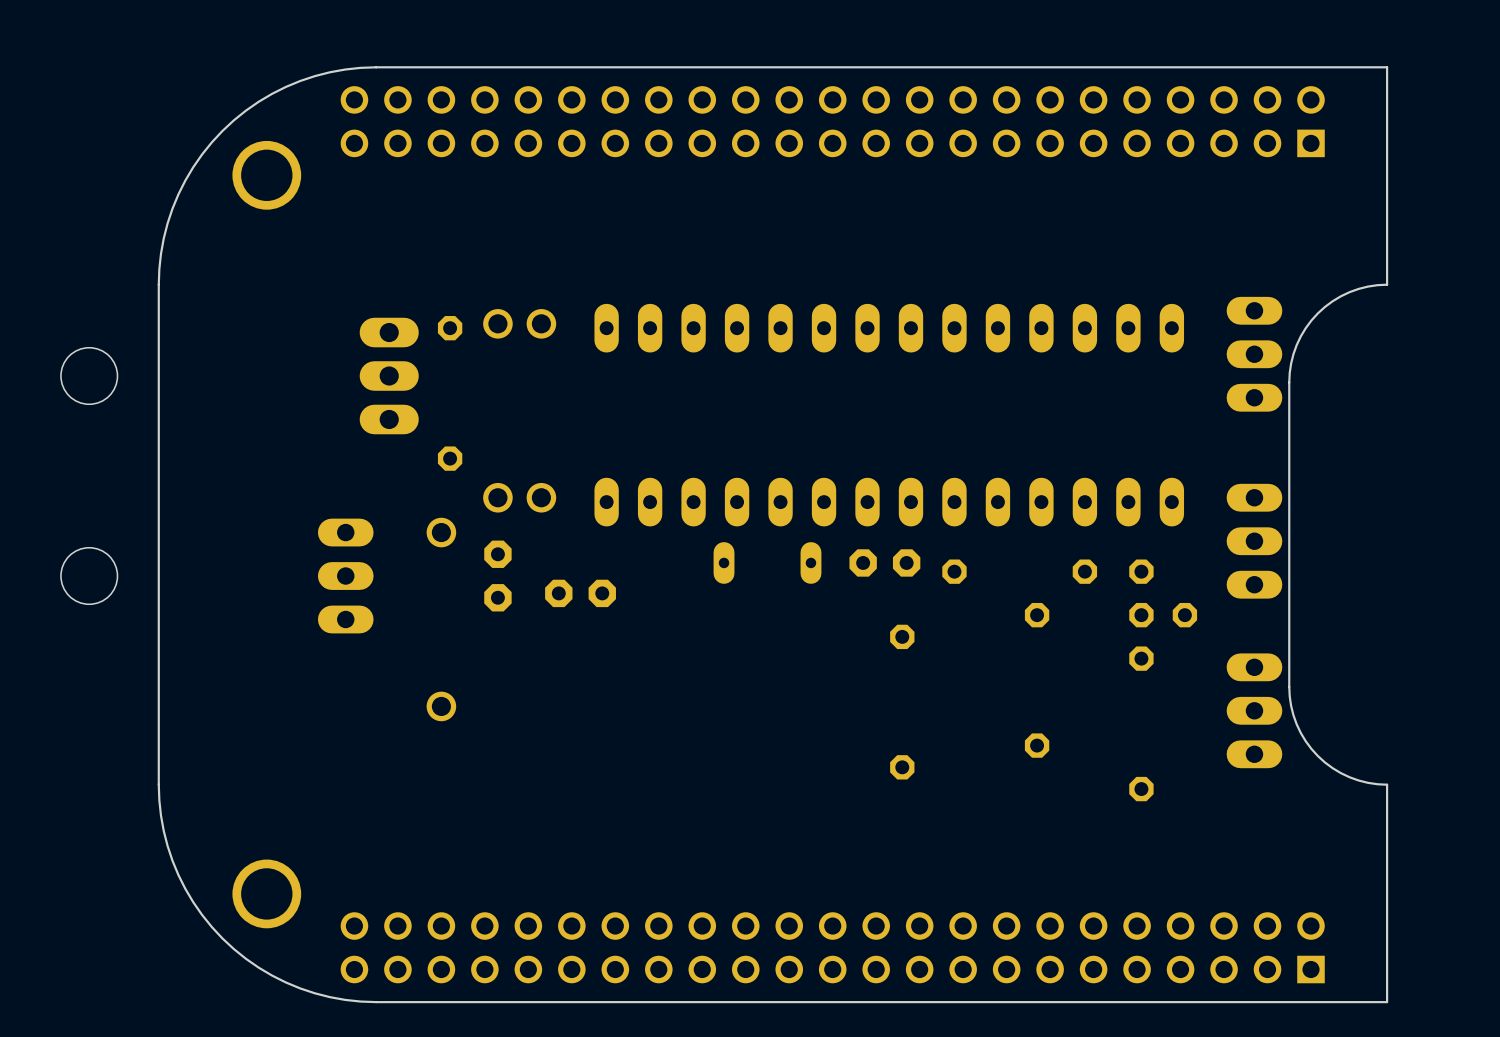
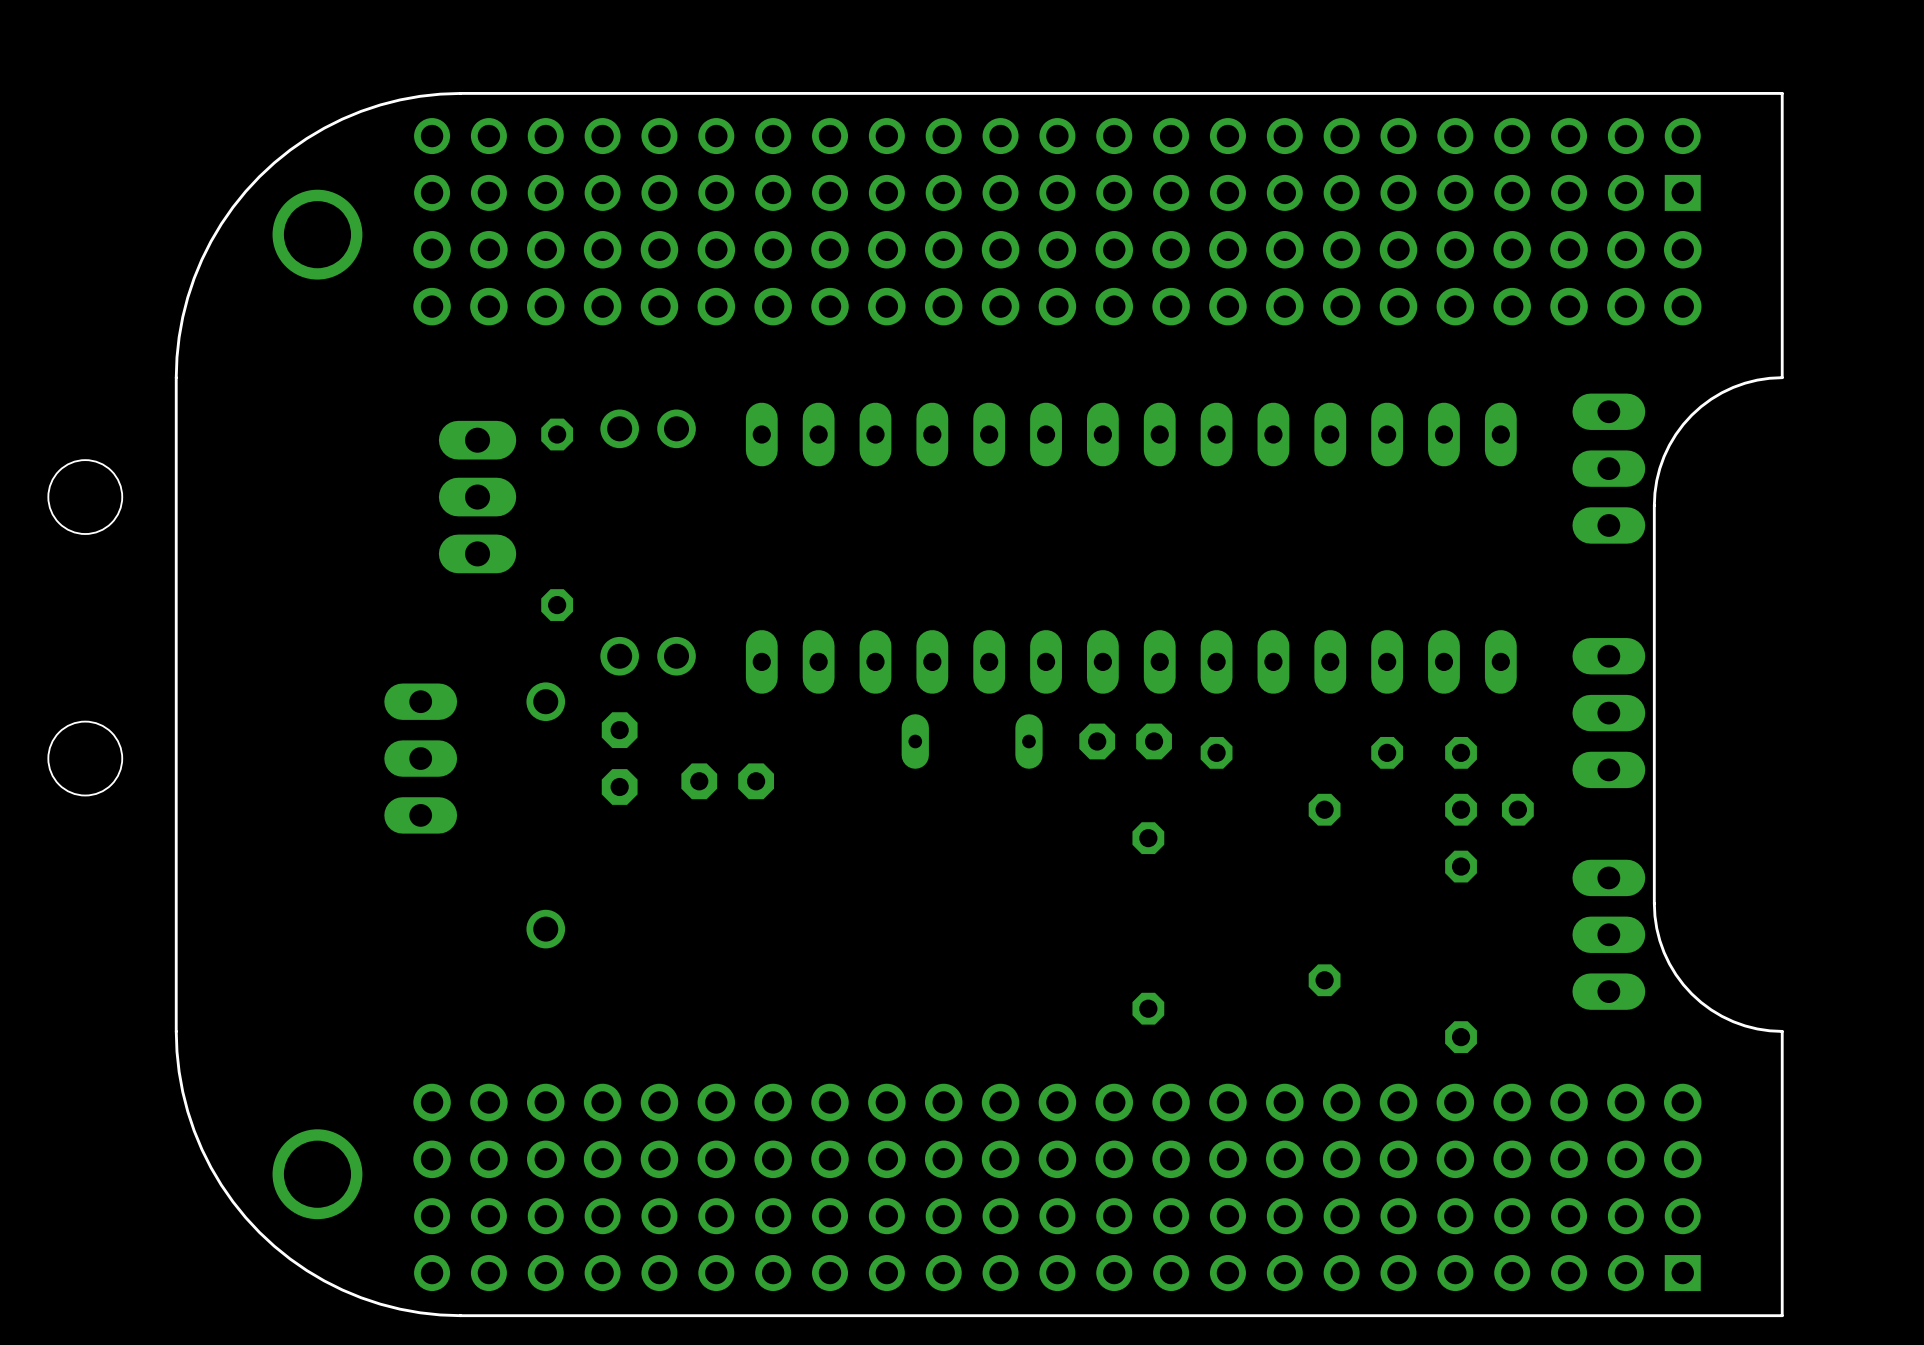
part: none -> (1057, 249)
part: none -> (1057, 306)
part: none -> (1057, 1102)
part: none -> (1057, 1159)

